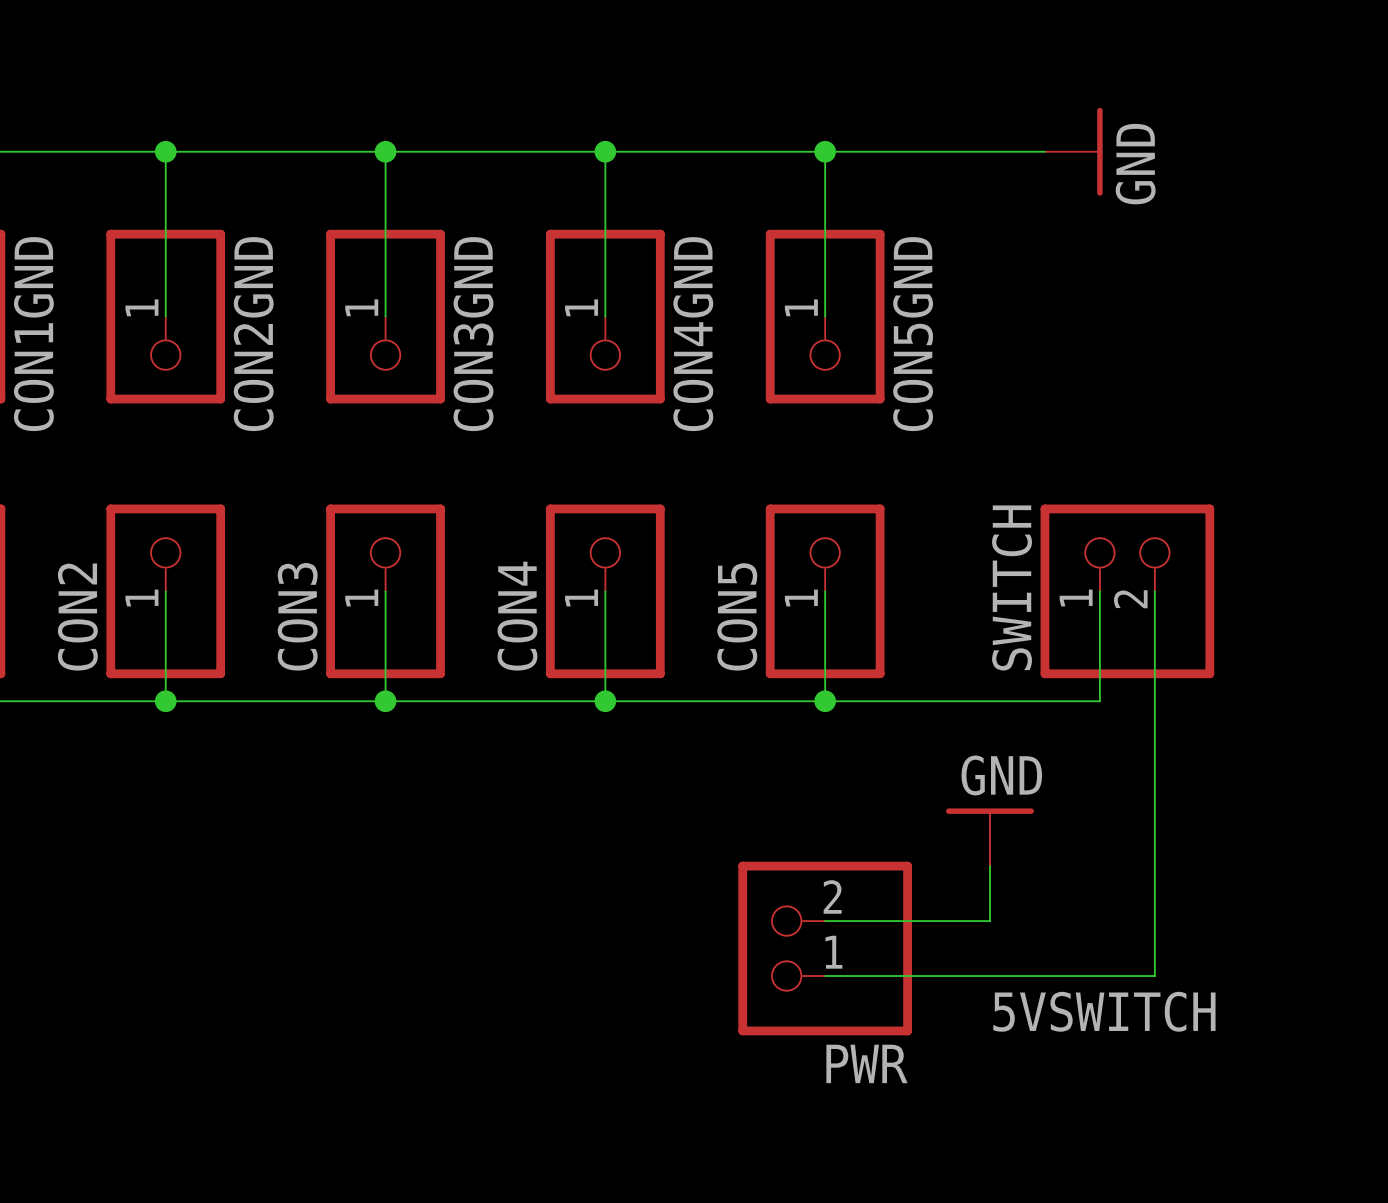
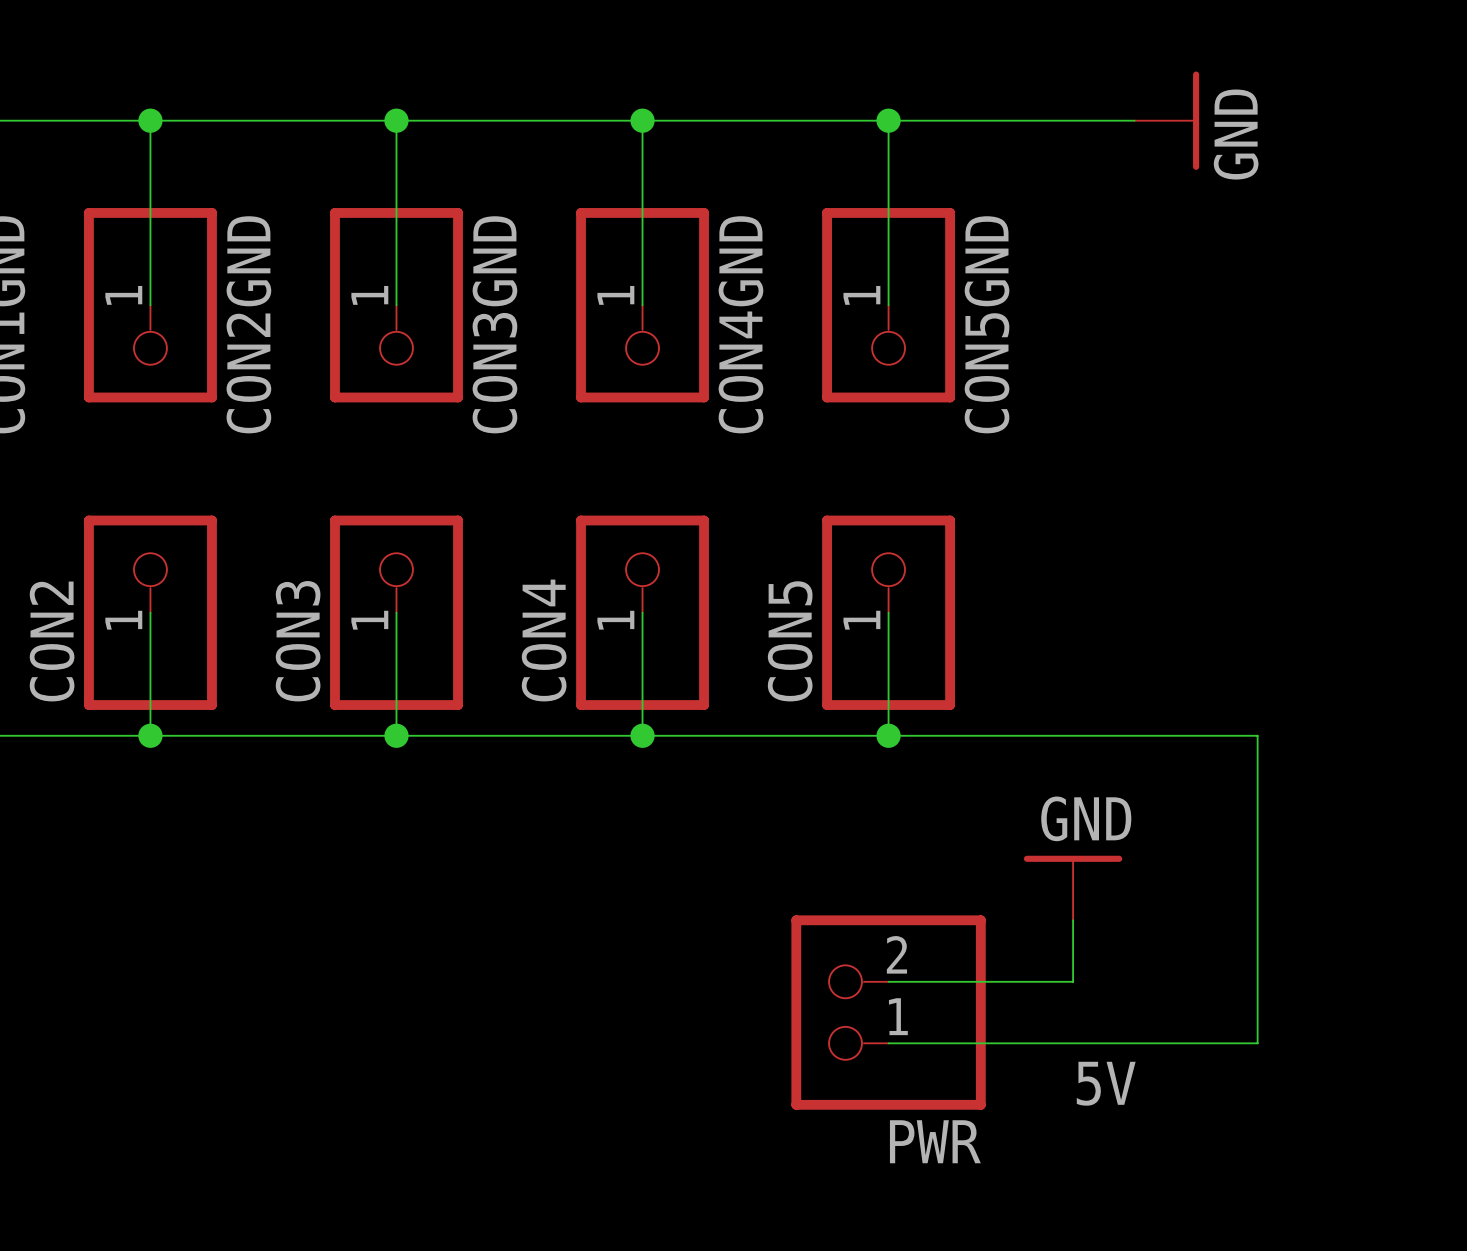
wire: (1099, 591) (1099, 701) -> (1257, 735) (1196, 735)
SWITCH: (1127, 591) -> none
wire: (1154, 591) (1154, 701) -> none
label: 5VSWITCH (1104, 1011) -> 5V (1106, 1083)

